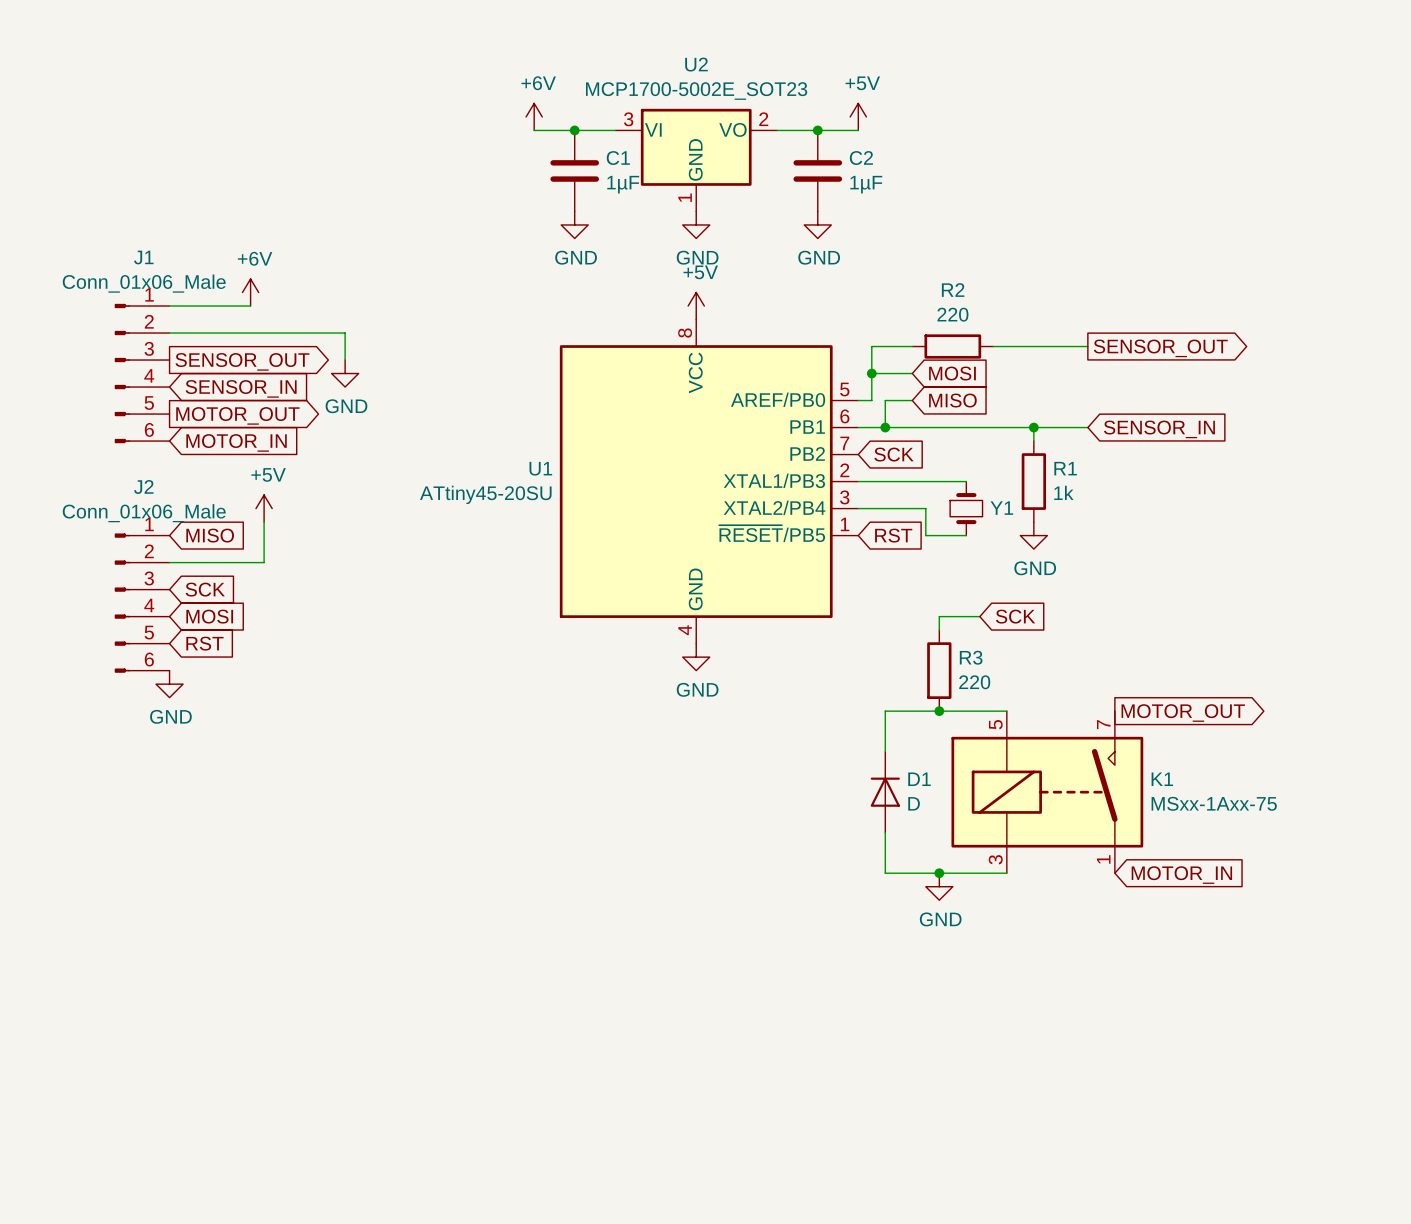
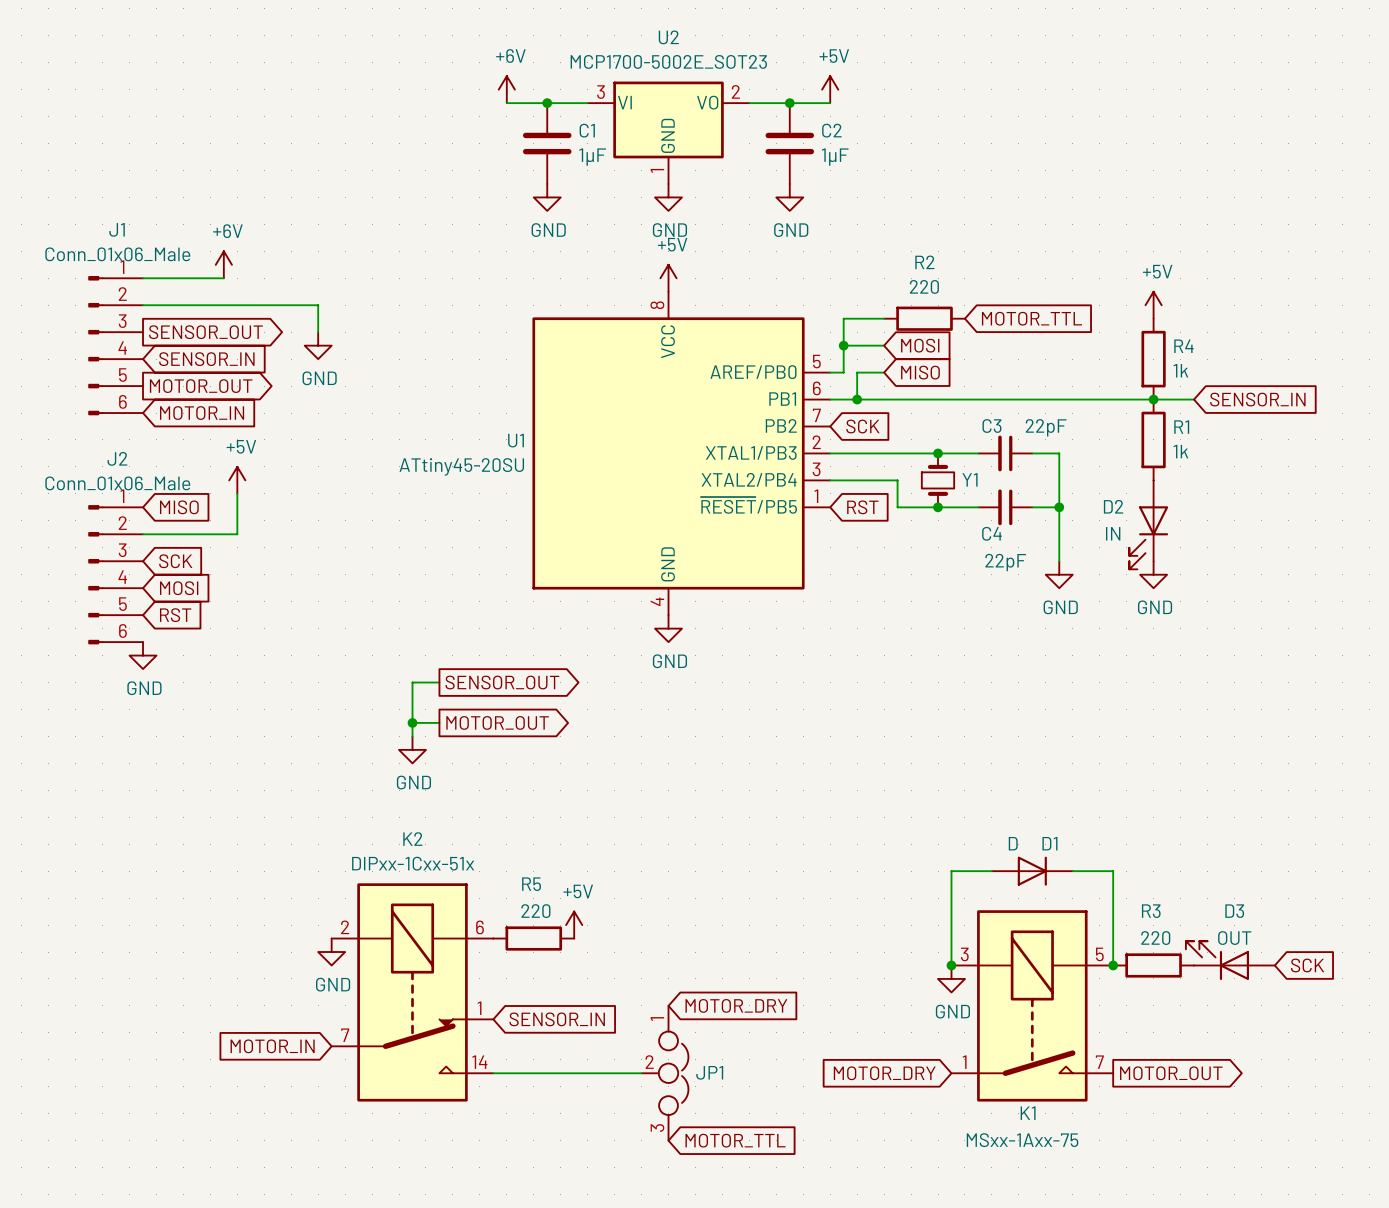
power symbol: none -> +5V (1153, 305)
wire: (993, 346) (1087, 346) -> none
global label: none -> MOTOR_TTL (1031, 318)
global label: SENSOR_OUT (1160, 348) -> none
R4: none -> 1k (1153, 359)
wire: (1033, 427) (1033, 441) -> none
junction: (1033, 427) -> none
wire: none -> (1059, 399) (1194, 399)
junction: none -> (1153, 399)
global label position: SENSOR_IN (1159, 429) -> SENSOR_IN (1257, 399)
wire: none -> (938, 453) (978, 453)
junction: none -> (938, 453)
R1 position: (1033, 481) -> (1153, 439)
C3: none -> 22pF (1005, 453)
wire: none -> (1032, 453) (1059, 453) (1059, 561)
wire: none -> (938, 507) (978, 507)
junction: none -> (938, 507)
C4: none -> 22pF (1005, 507)
power symbol: GND (1033, 535) -> none
wire: none -> (1032, 507) (1059, 507)
junction: none -> (1059, 507)
D2: none -> IN (1148, 524)
power symbol: none -> GND (1059, 574)
power symbol: none -> GND (1153, 574)
wire: (979, 616) (939, 616) (939, 630) -> none
global label: SCK (1015, 616) -> none
R3 name position: R3 (971, 657) -> R3 (1151, 911)
R3 rotation: 0° (939, 670) -> 90° clockwise (1153, 965)
R3 position: (939, 670) -> (1153, 965)
R3 value position: 220 (974, 682) -> 220 (1155, 938)
wire: none -> (439, 682) (412, 682) (412, 736)
junction: (939, 711) -> none
wire: (1006, 711) (885, 711) (885, 751) -> none
global label: none -> SENSOR_OUT (502, 682)
global label: MOTOR_OUT (1183, 713) -> none
wire: none -> (412, 722) (439, 722)
junction: none -> (412, 722)
global label: none -> MOTOR_OUT (497, 722)
power symbol: none -> GND (412, 749)
D1 name position: D1 (919, 779) -> D1 (1049, 843)
D1 rotation: 0° (885, 792) -> 90° clockwise (1032, 871)
D1 position: (885, 792) -> (1032, 871)
K1 rotation: 0° (1047, 792) -> 90° clockwise (1032, 1005)
K1 position: (1047, 792) -> (1032, 1005)
D1 value position: D (914, 803) -> D (1013, 843)
K1 value position: MSxx-1Axx-75 (1214, 803) -> MSxx-1Axx-75 (1022, 1140)
wire: (885, 832) (885, 873) (1006, 873) -> none
junction: (939, 873) -> none
global label: MOTOR_IN (1181, 875) -> none
power symbol position: GND (939, 886) -> GND (951, 978)
wire: none -> (991, 871) (951, 871) (951, 965)
wire: none -> (1072, 871) (1113, 871) (1113, 965)
power symbol: none -> +5V (574, 925)
R5: none -> 220 (533, 938)
power symbol: none -> GND (331, 952)
D3: none -> OUT (1230, 960)
junction: none -> (951, 965)
junction: none -> (1113, 965)
global label: none -> SCK (1307, 965)
K2: none -> DIPxx-1Cxx-51x (412, 992)
global label: none -> MOTOR_DRY (736, 1005)
global label: none -> SENSOR_IN (557, 1019)
global label: none -> MOTOR_IN (272, 1046)
wire: none -> (493, 1073) (641, 1073)
JP1: none -> (665, 1073)
global label: none -> MOTOR_DRY (884, 1073)
global label: none -> MOTOR_OUT (1171, 1073)
global label: none -> MOTOR_TTL (735, 1140)

